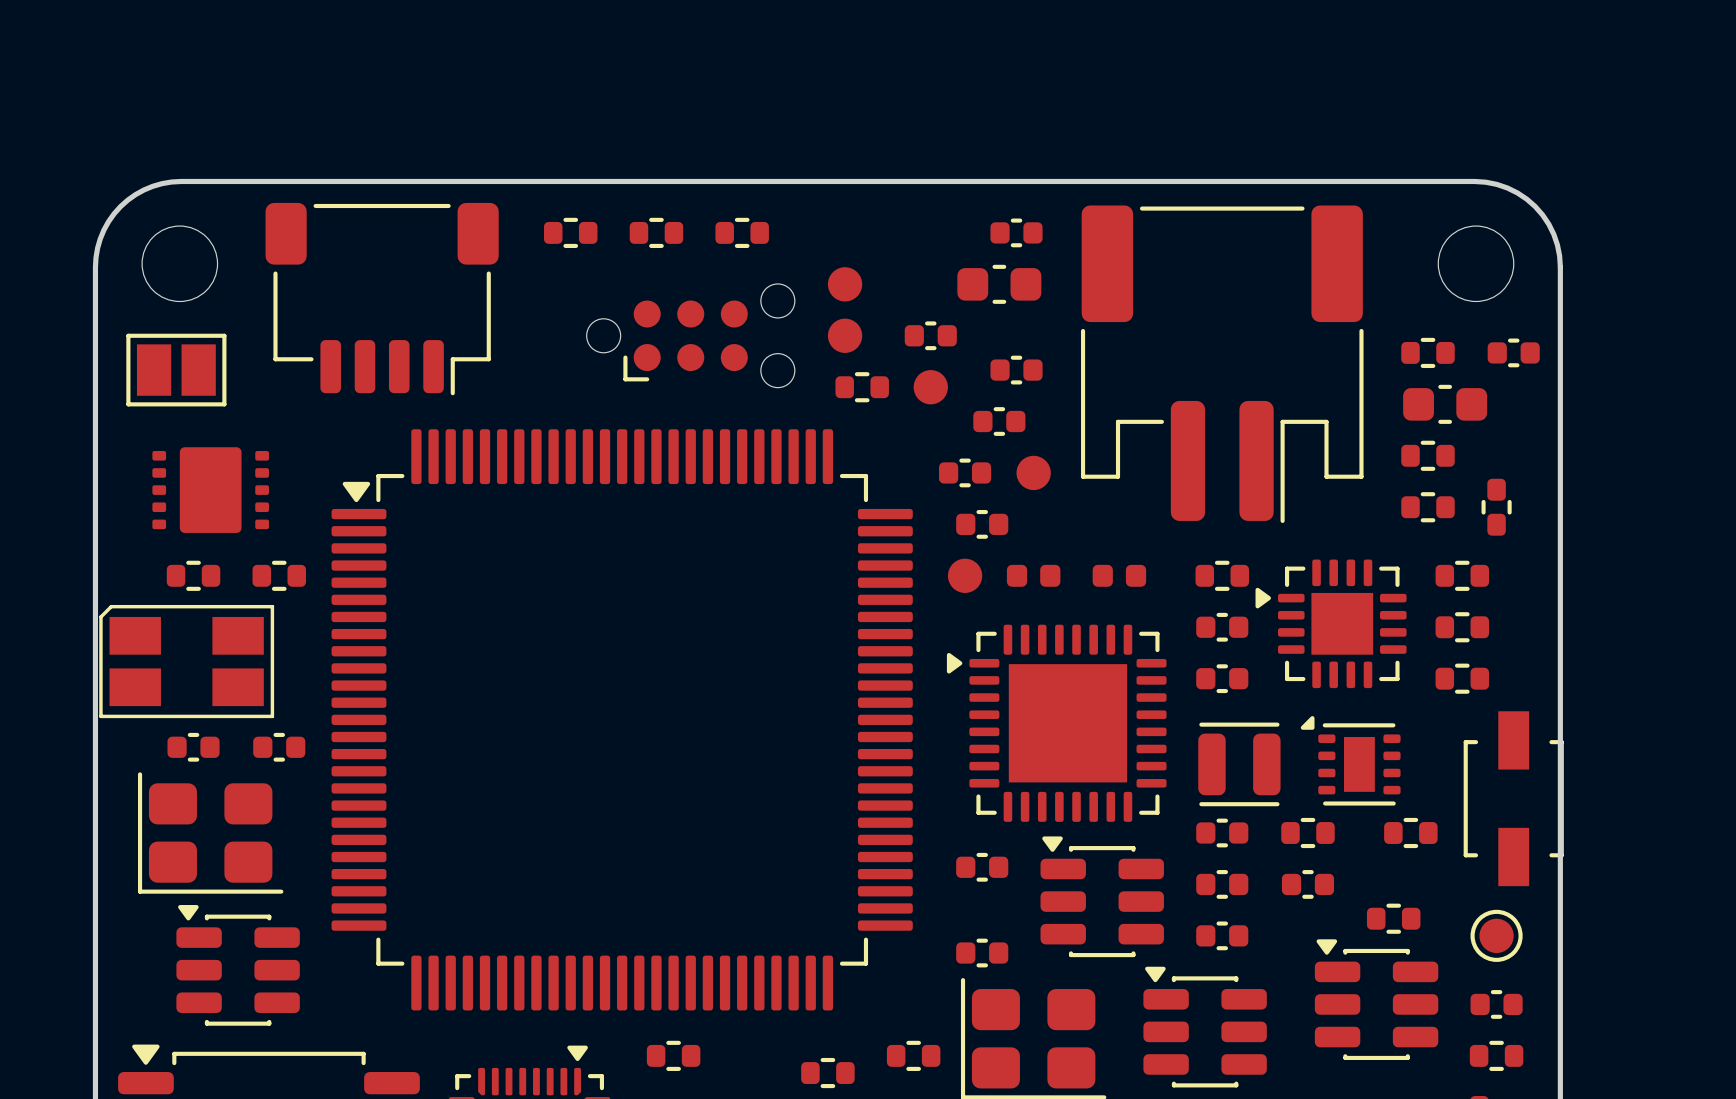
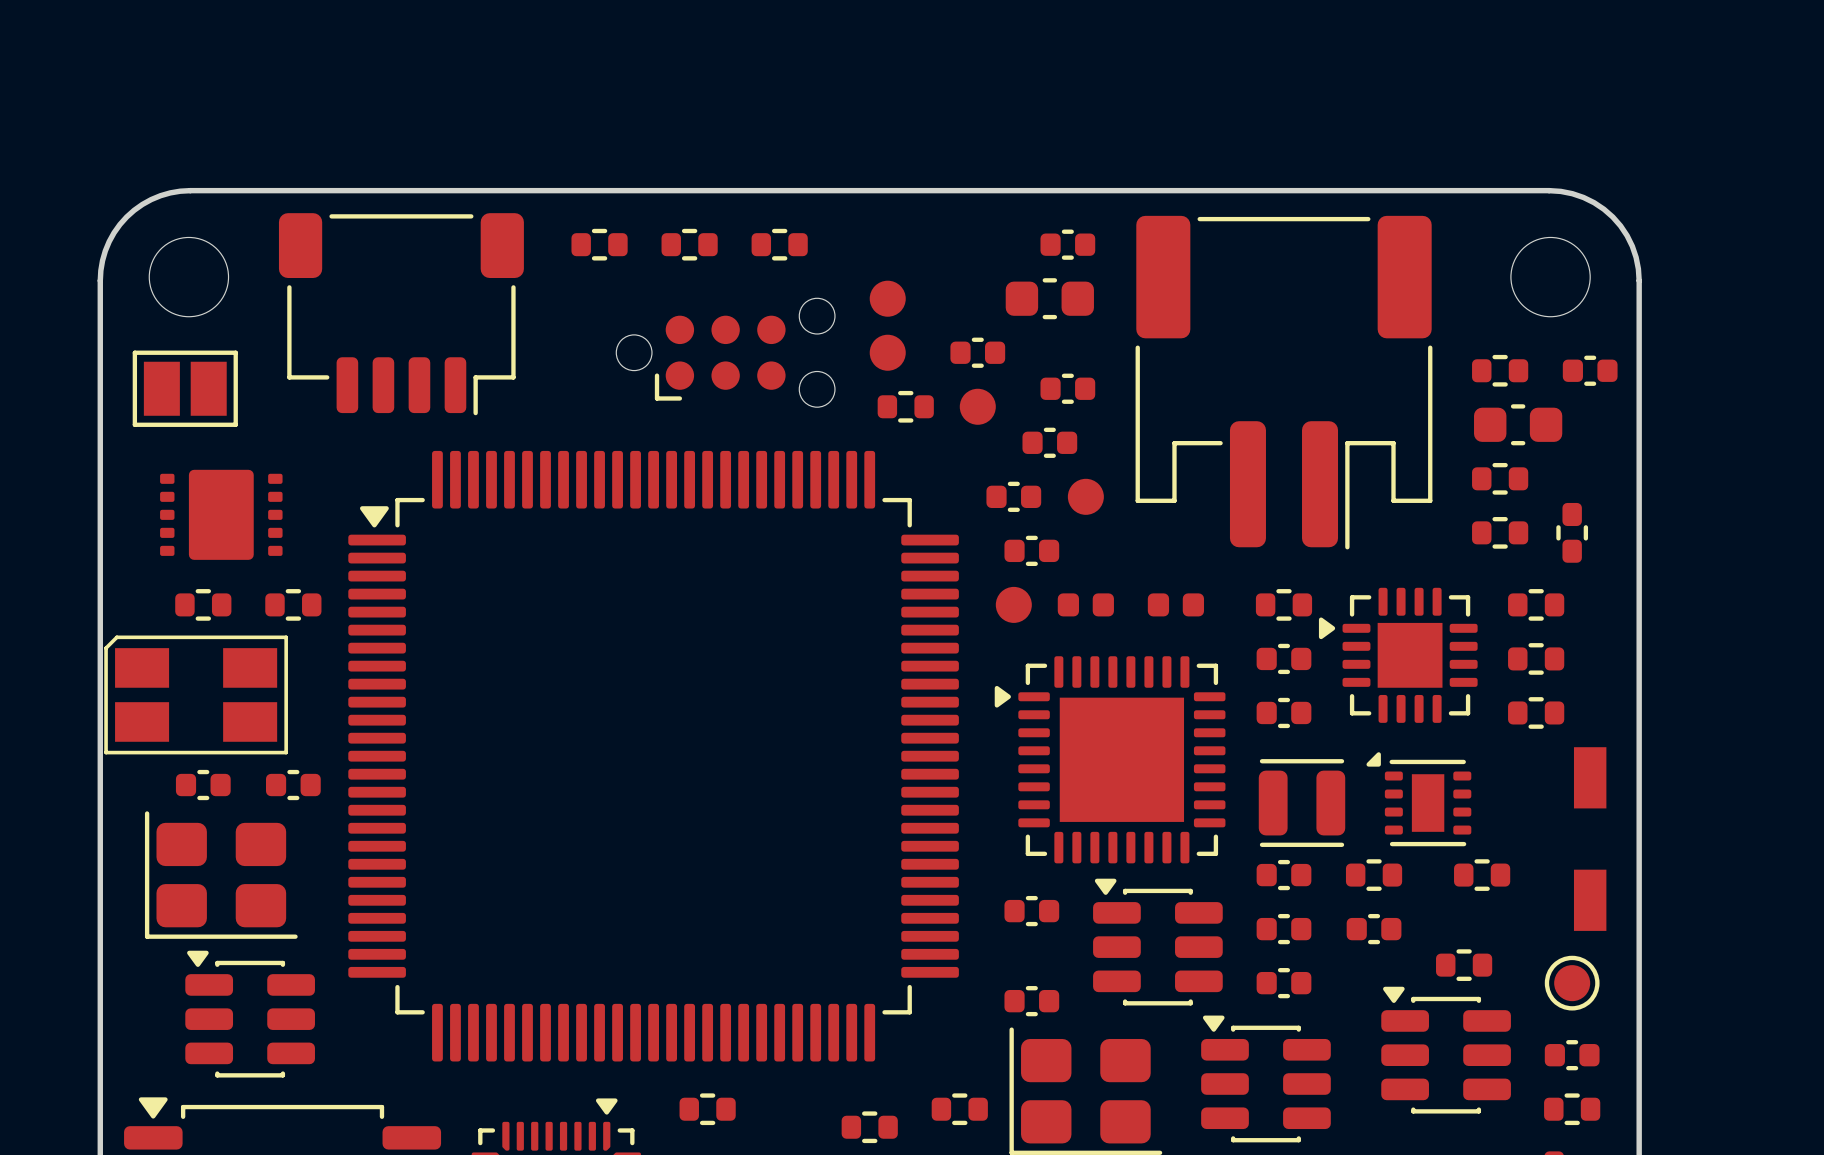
part footprint: [1463, 711, 1564, 887] -> [1573, 747, 1607, 931]

